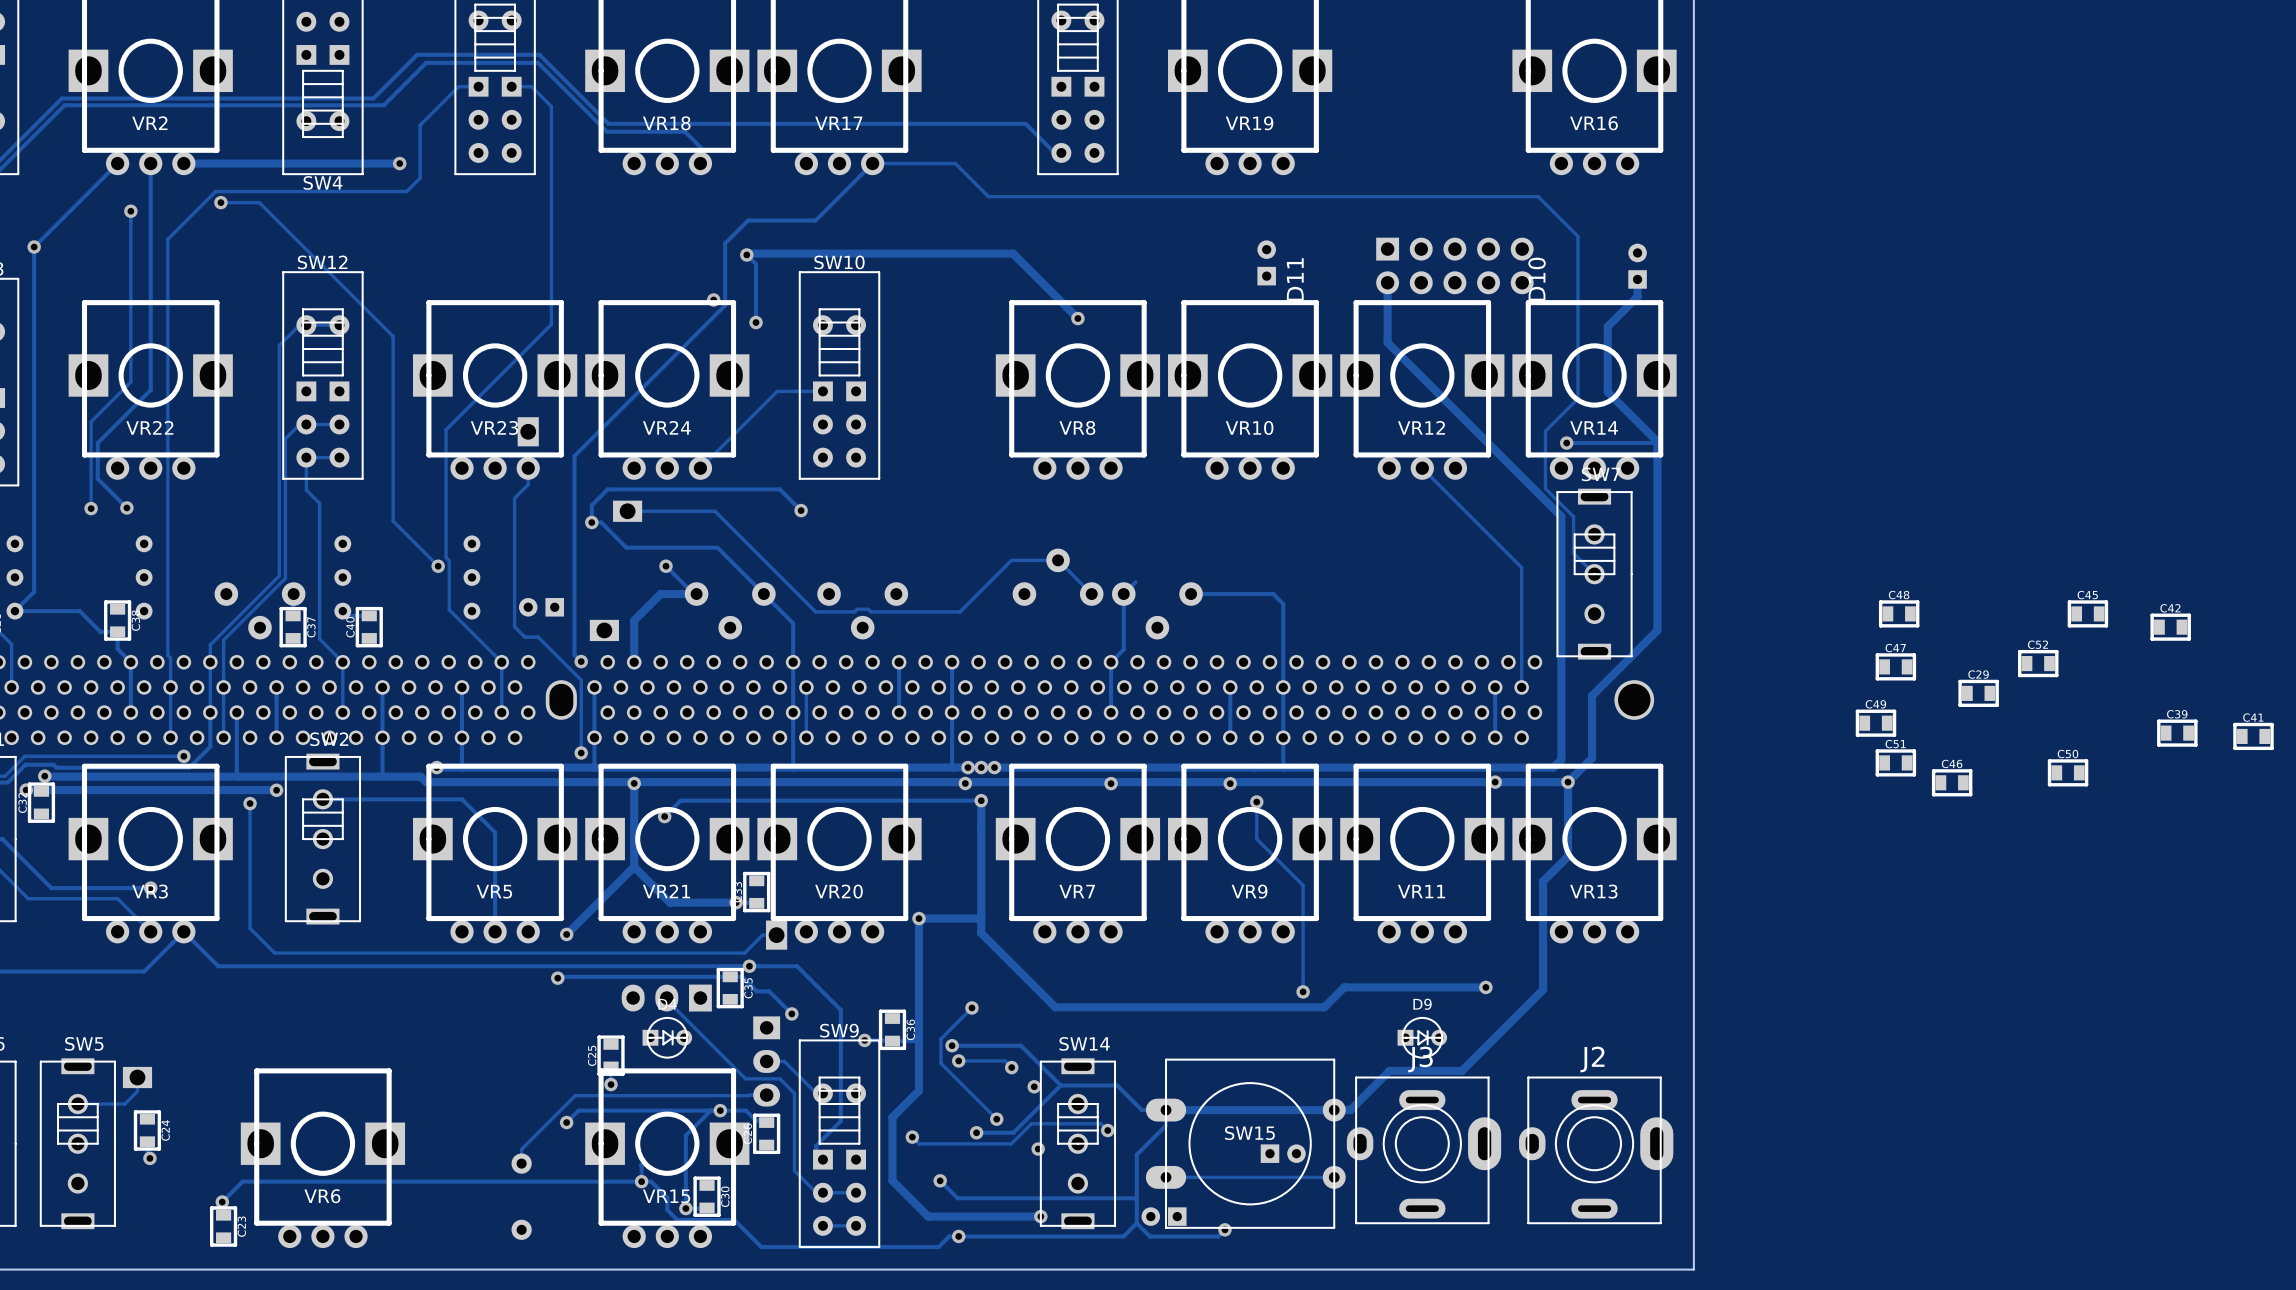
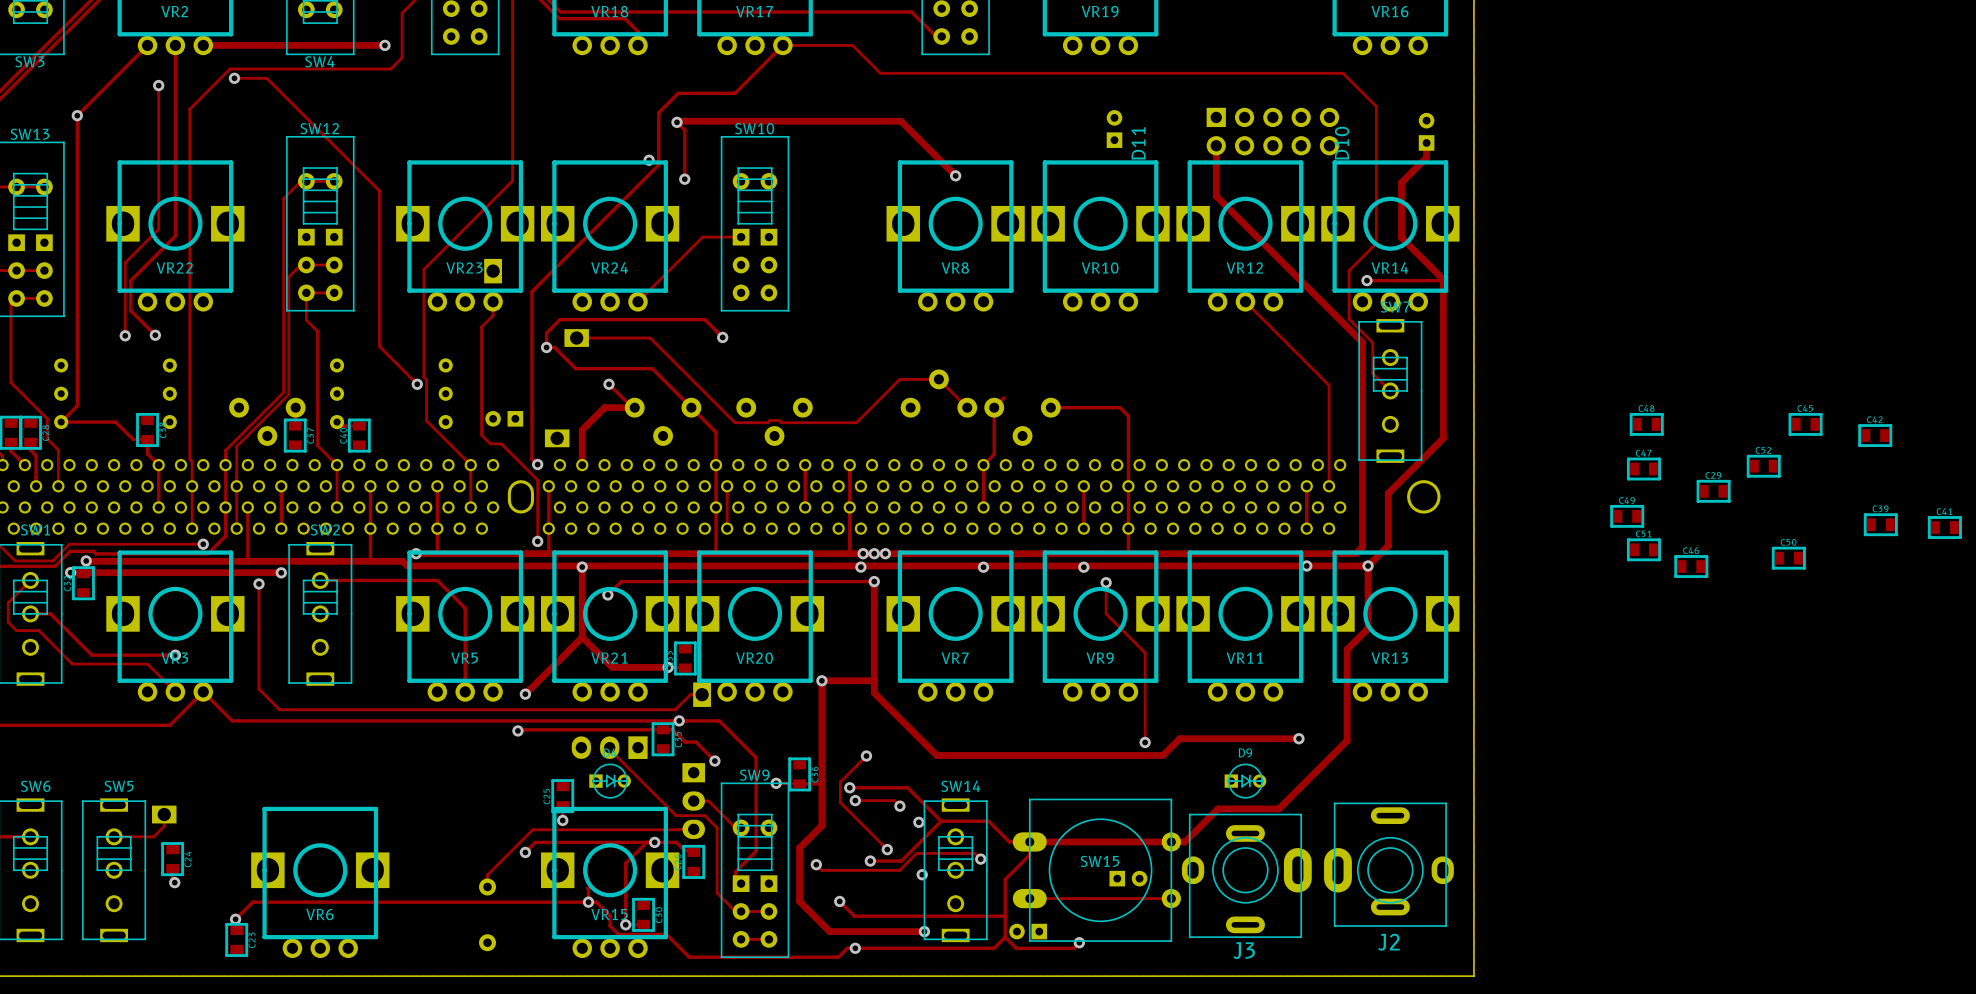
J3 name position: J3 (1420, 1059) -> J3 (1244, 950)
J2 rotation: 0° (1596, 1150) -> 180° (1388, 864)

